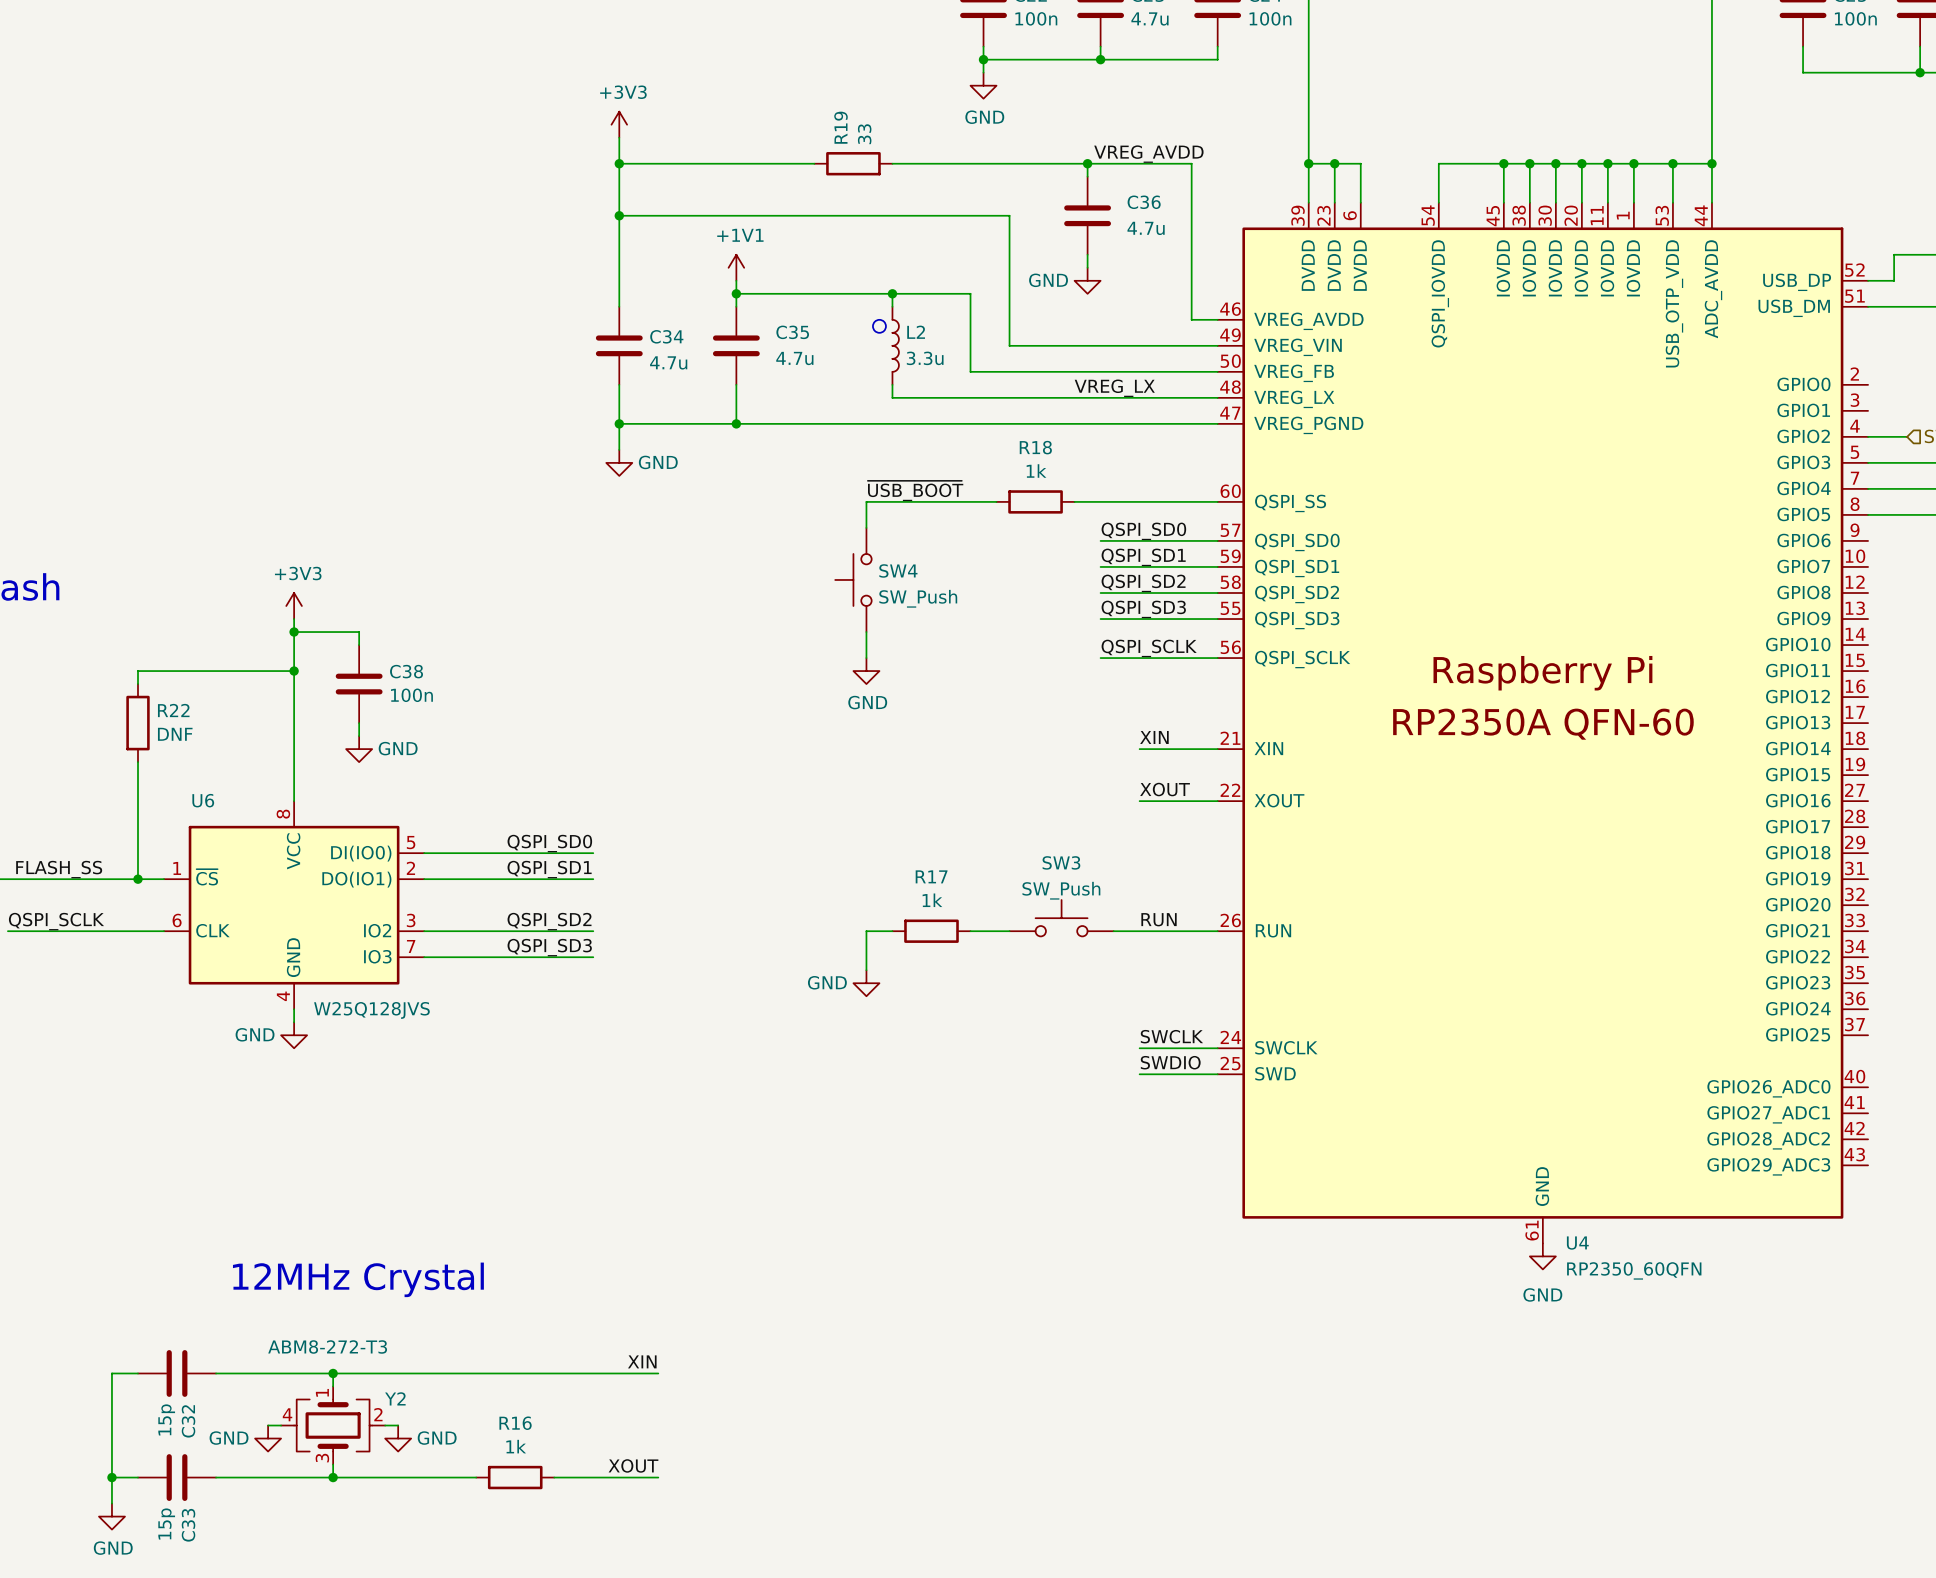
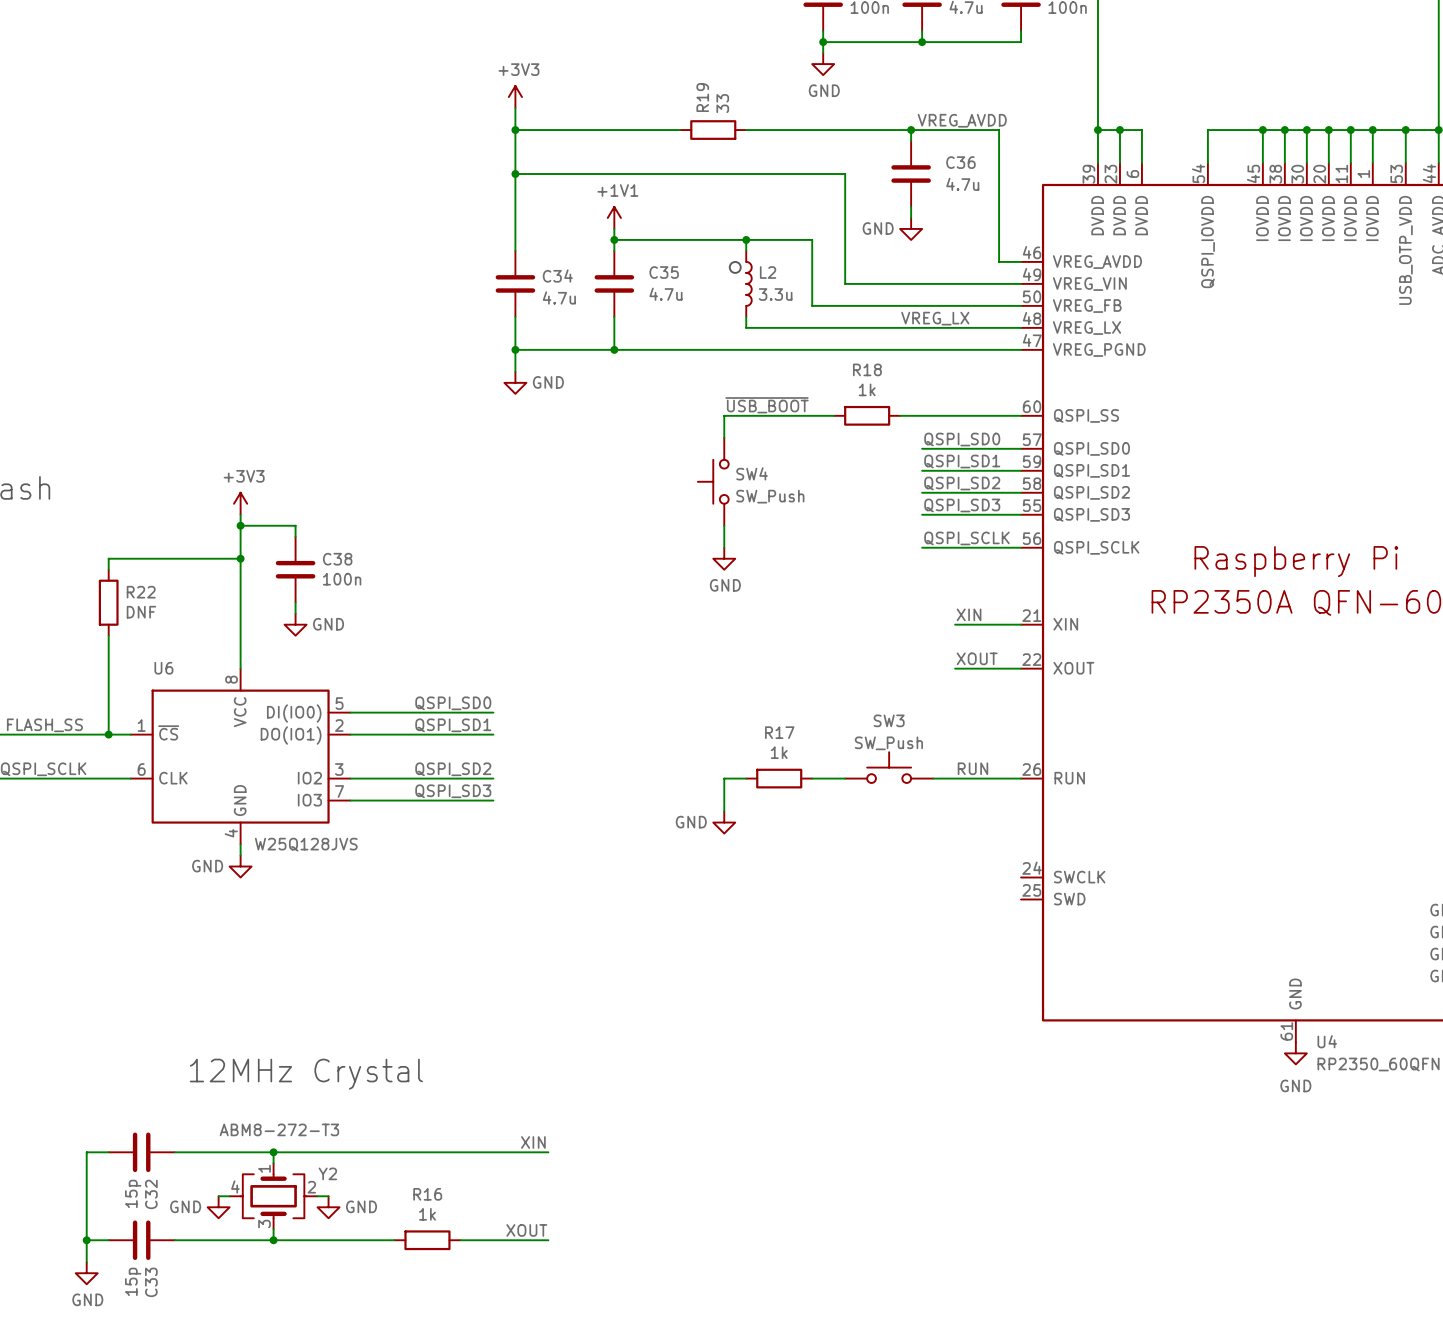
label: SWCLK (1171, 1036) -> none
wire: (1139, 1048) (1217, 1048) -> none
label: SWDIO (1170, 1062) -> none
wire: (1139, 1074) (1217, 1074) -> none

